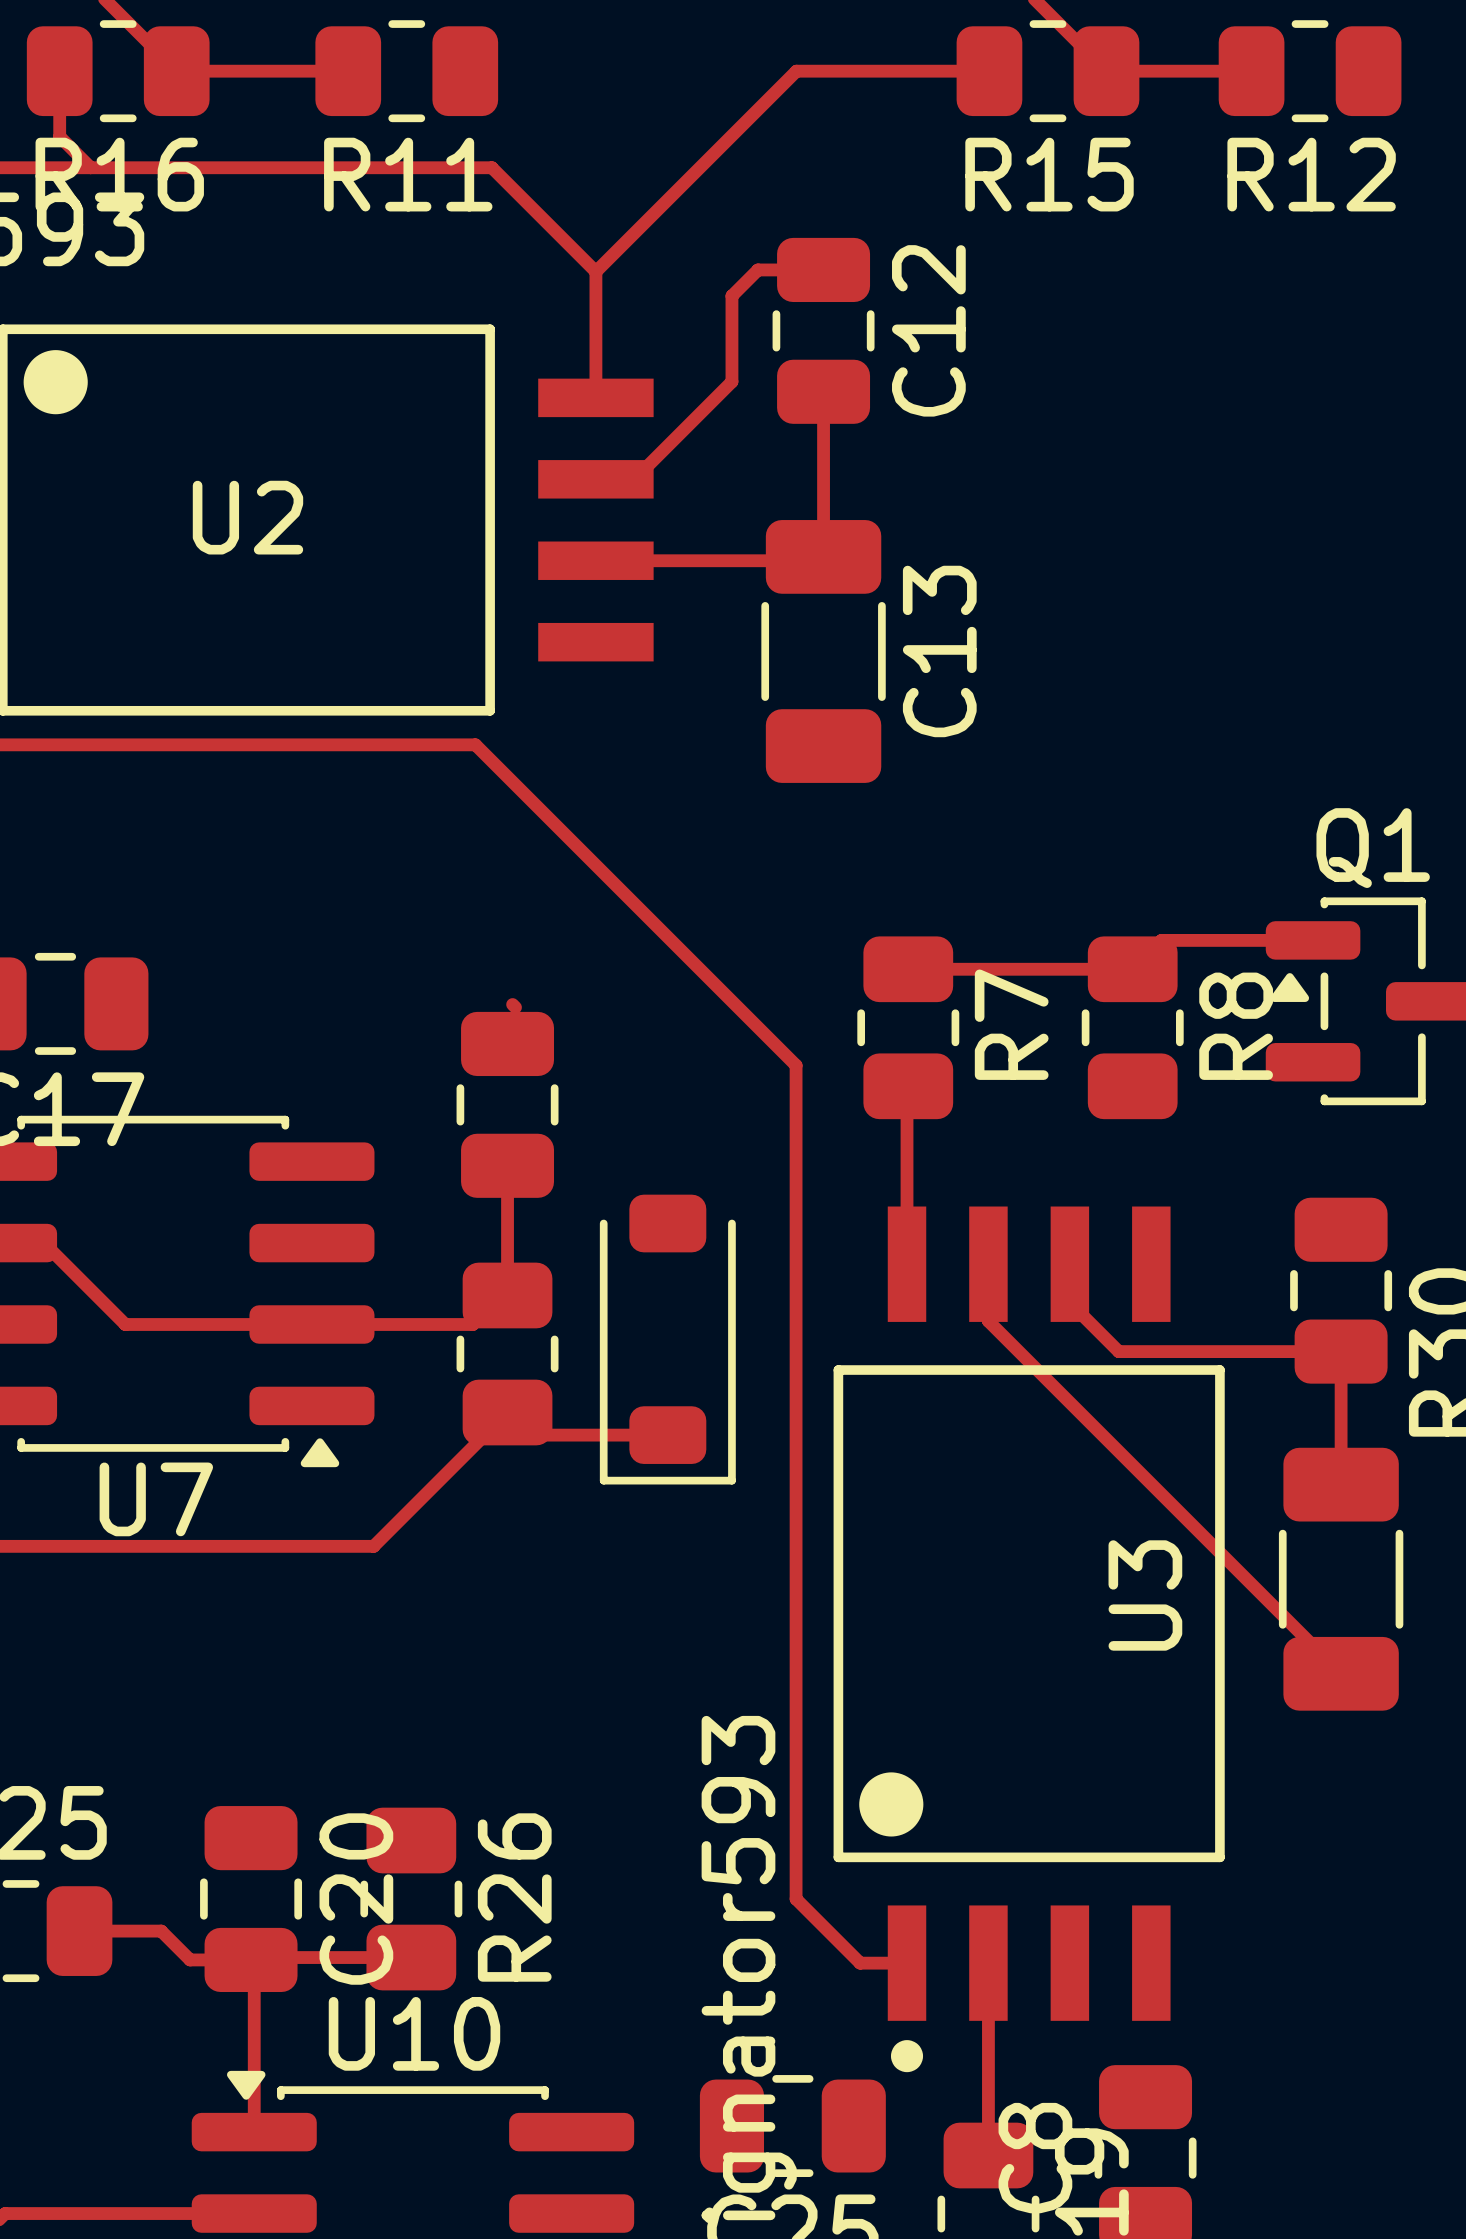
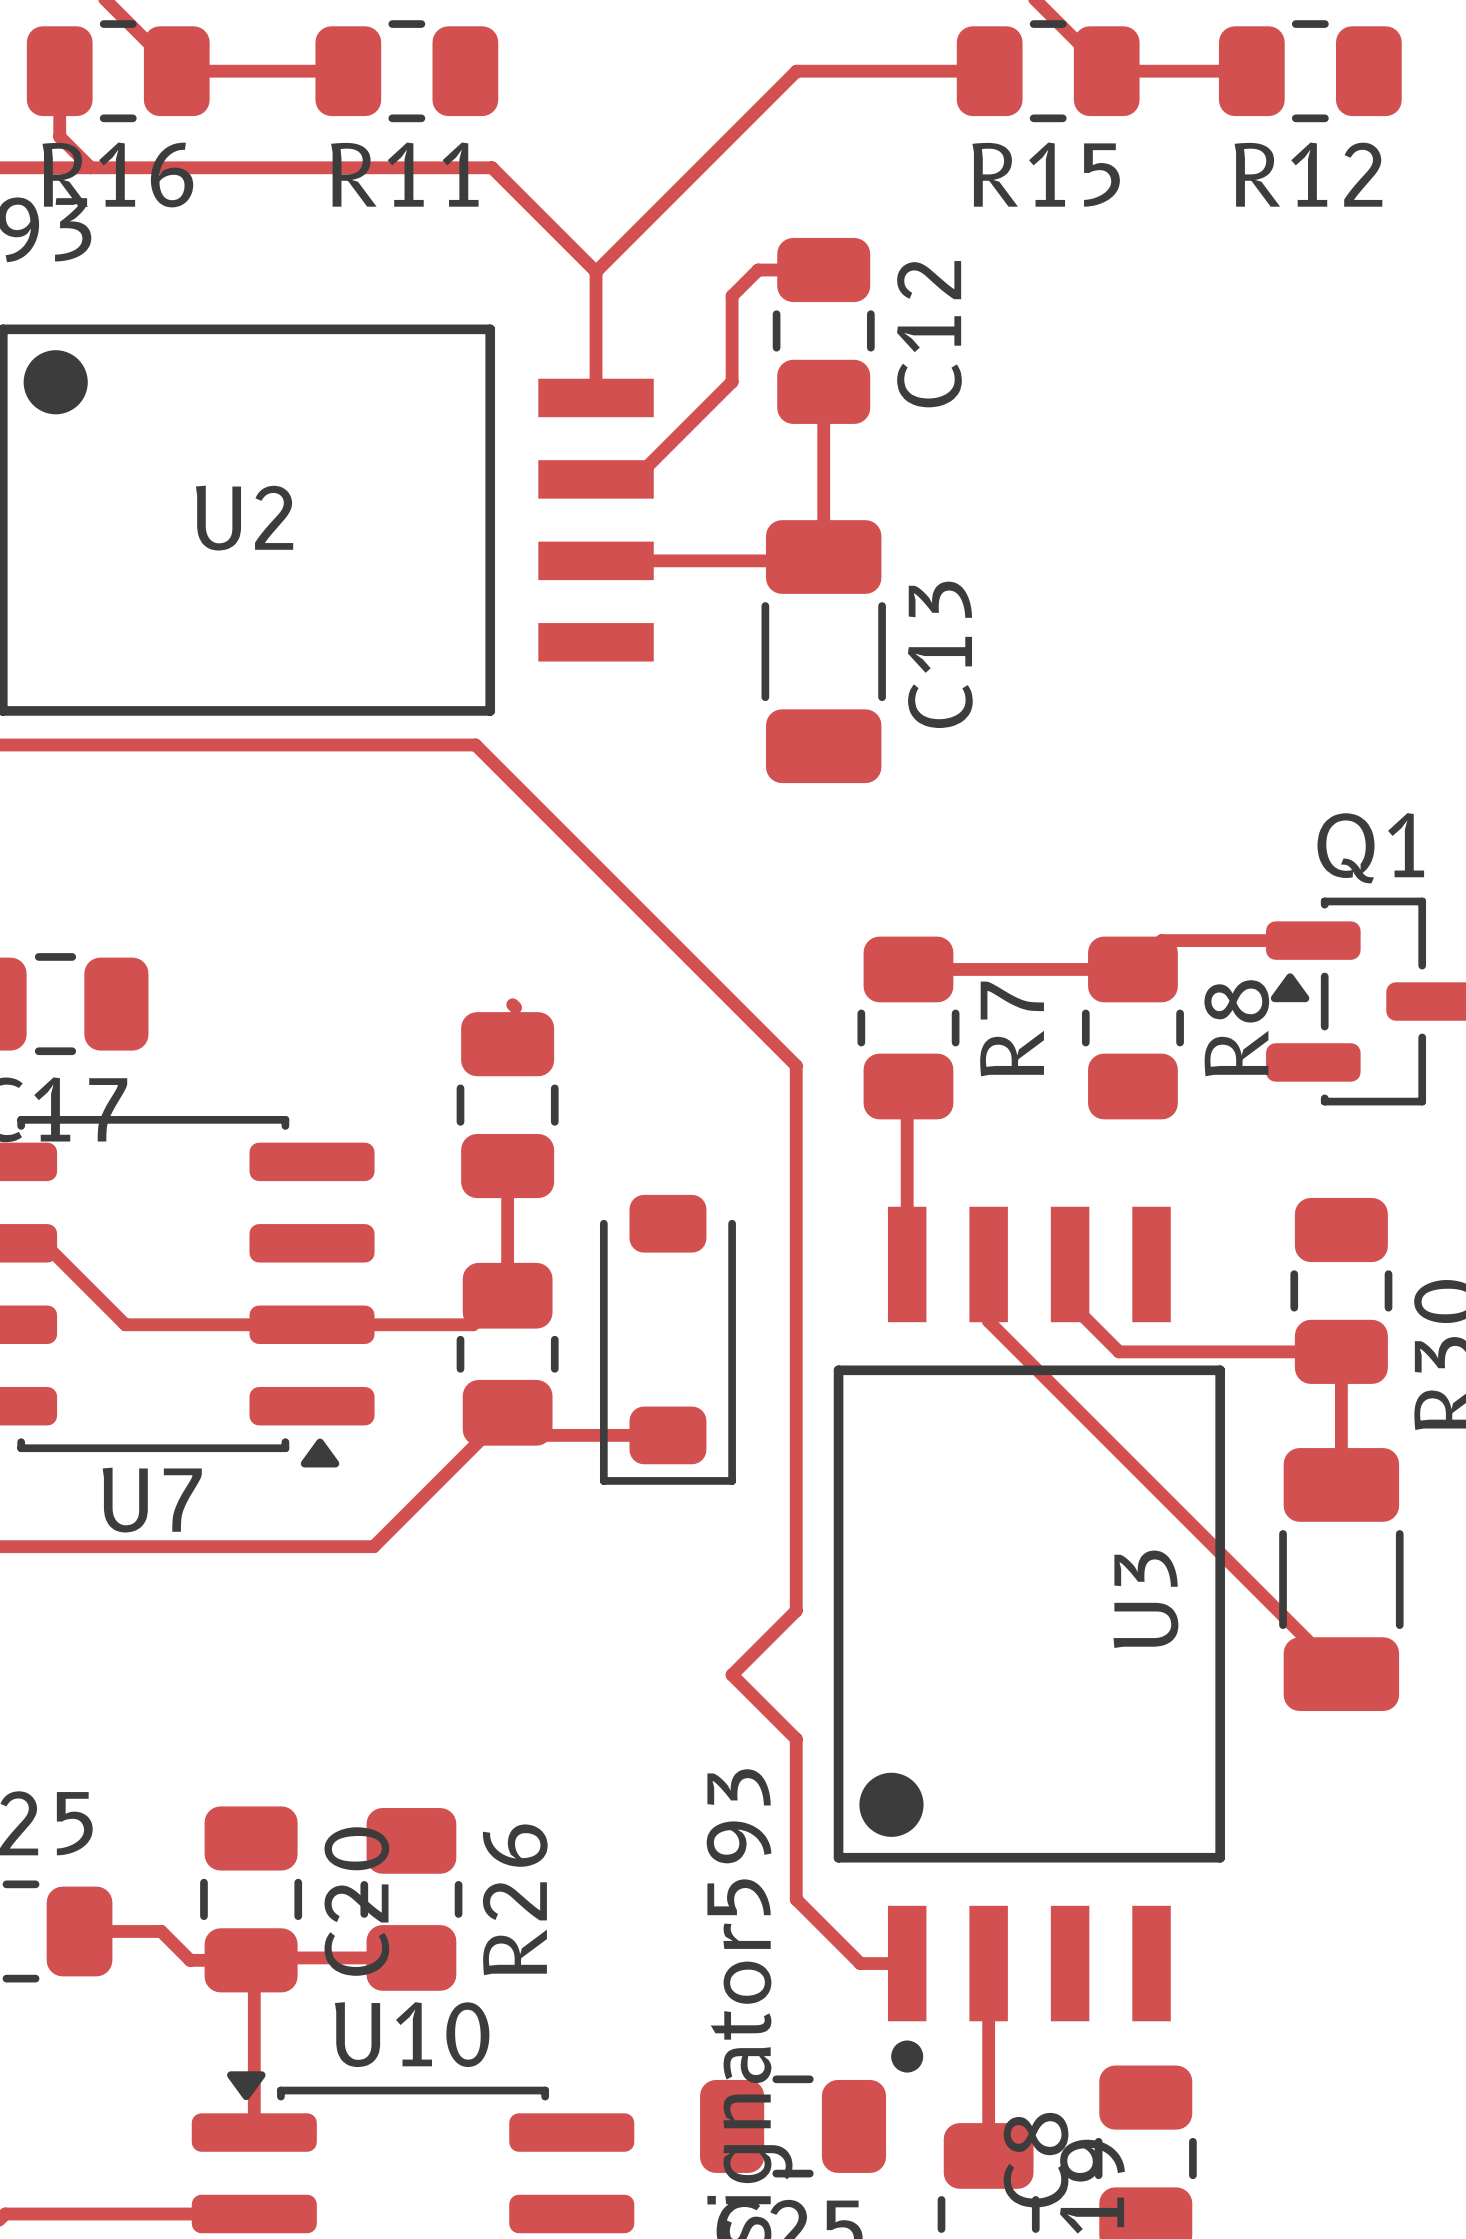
top track: (796, 1610) (796, 1738) -> (796, 1610) (732, 1674) (796, 1739)

